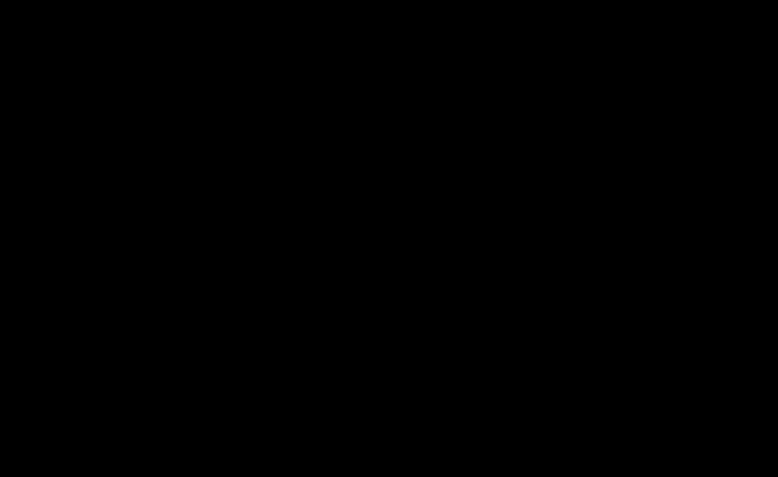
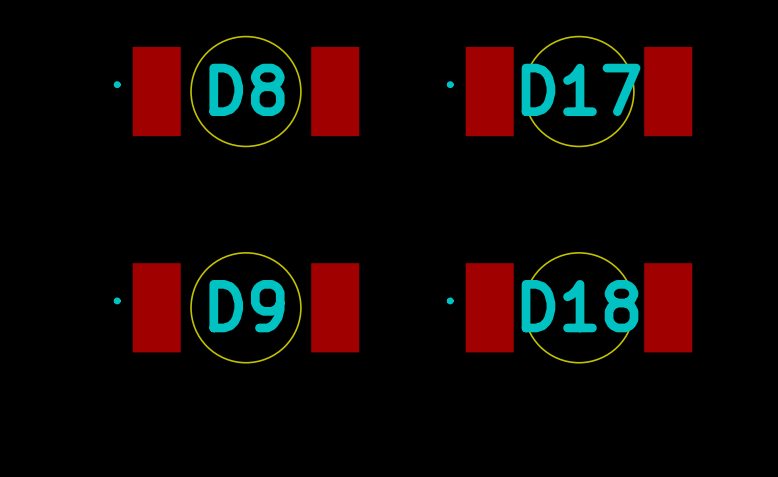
D8: none -> (236, 91)
D17: none -> (569, 91)
D9: none -> (236, 307)
D18: none -> (569, 307)

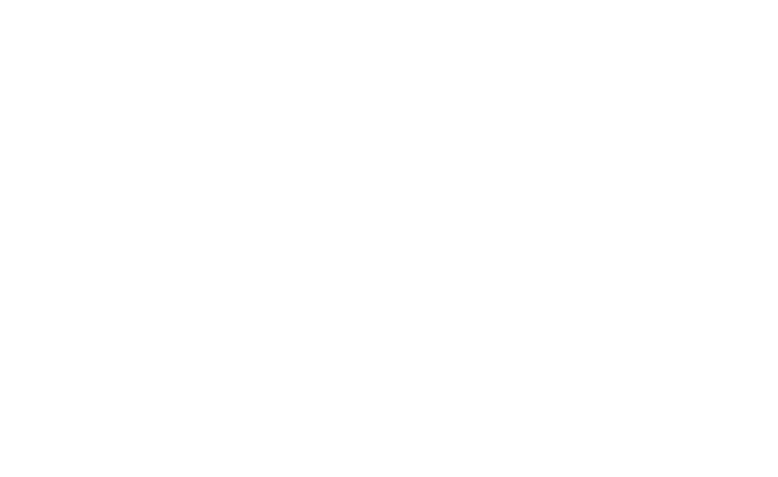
D8: (236, 91) -> none
D17: (569, 91) -> none
D9: (236, 307) -> none
D18: (569, 307) -> none

